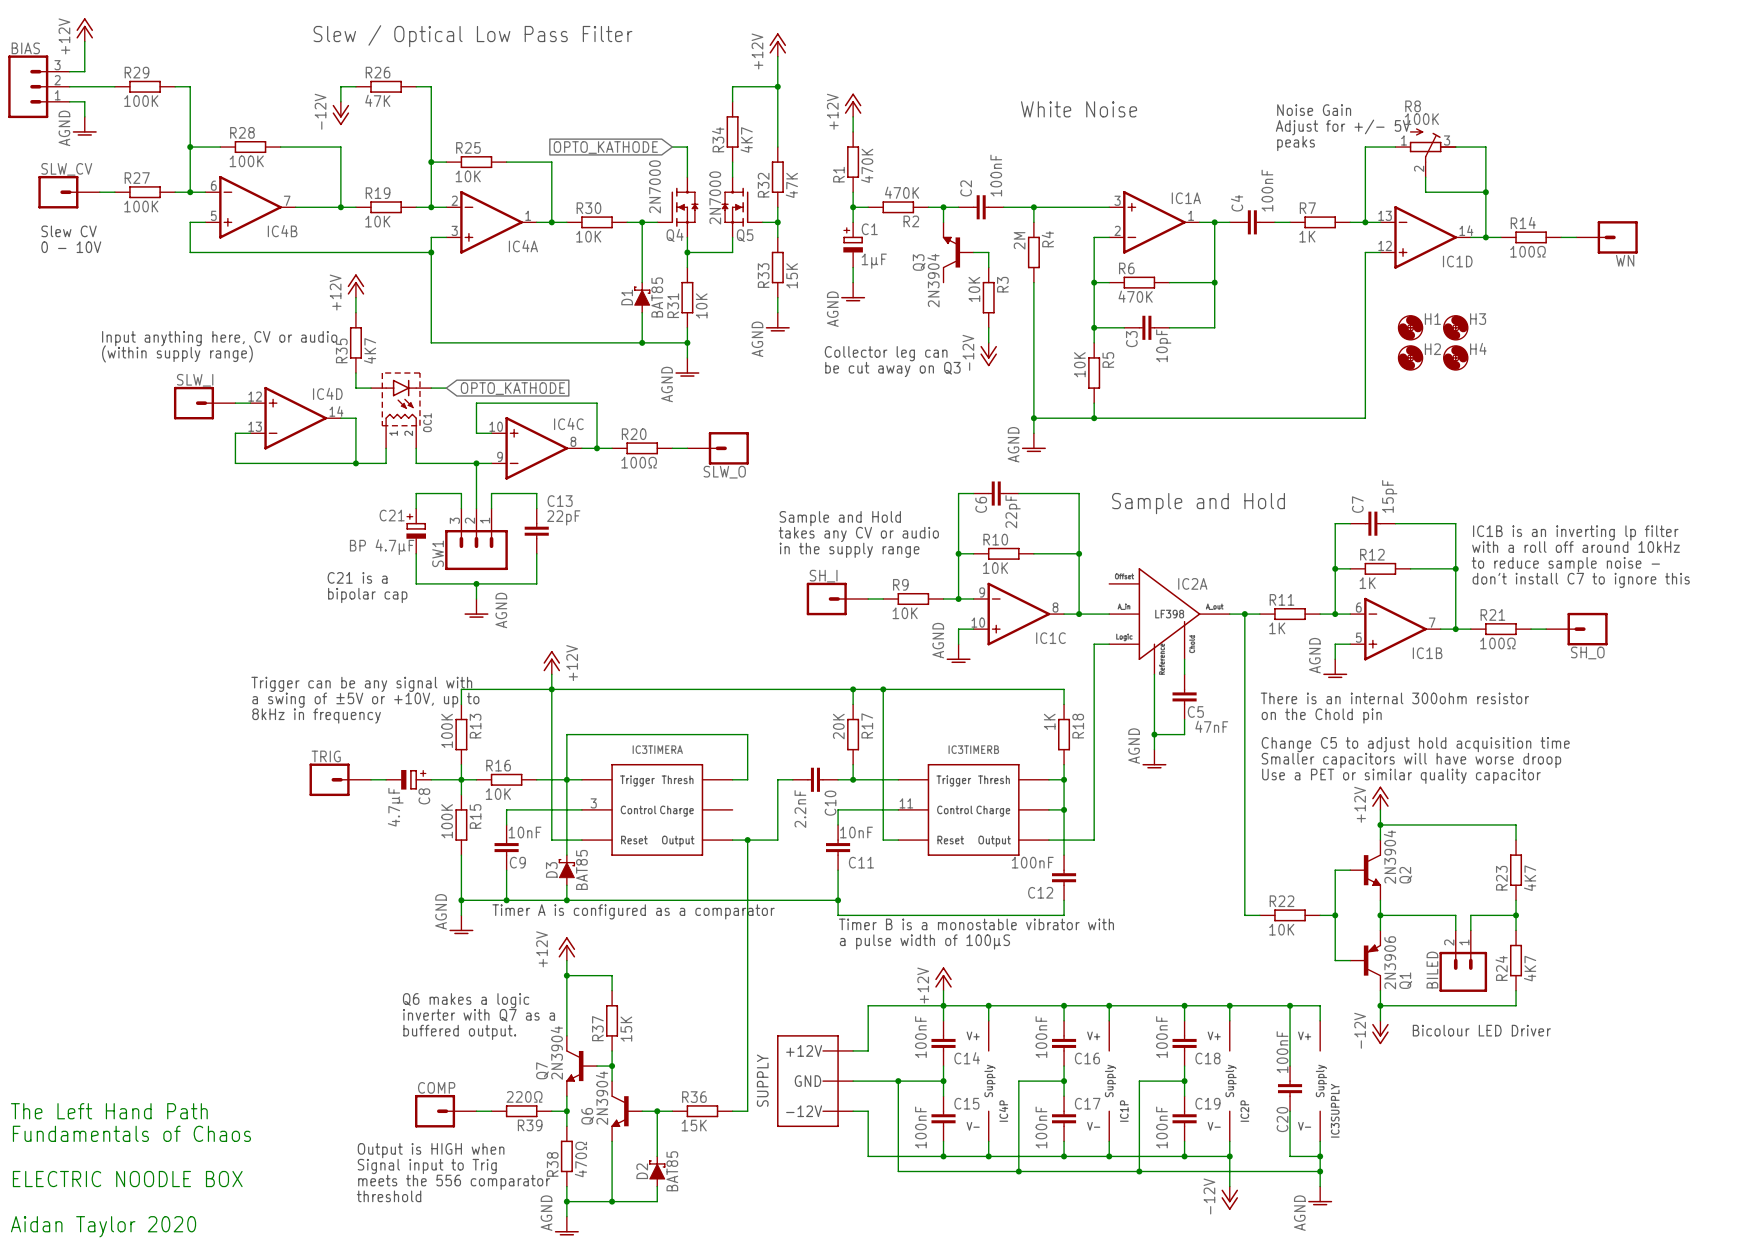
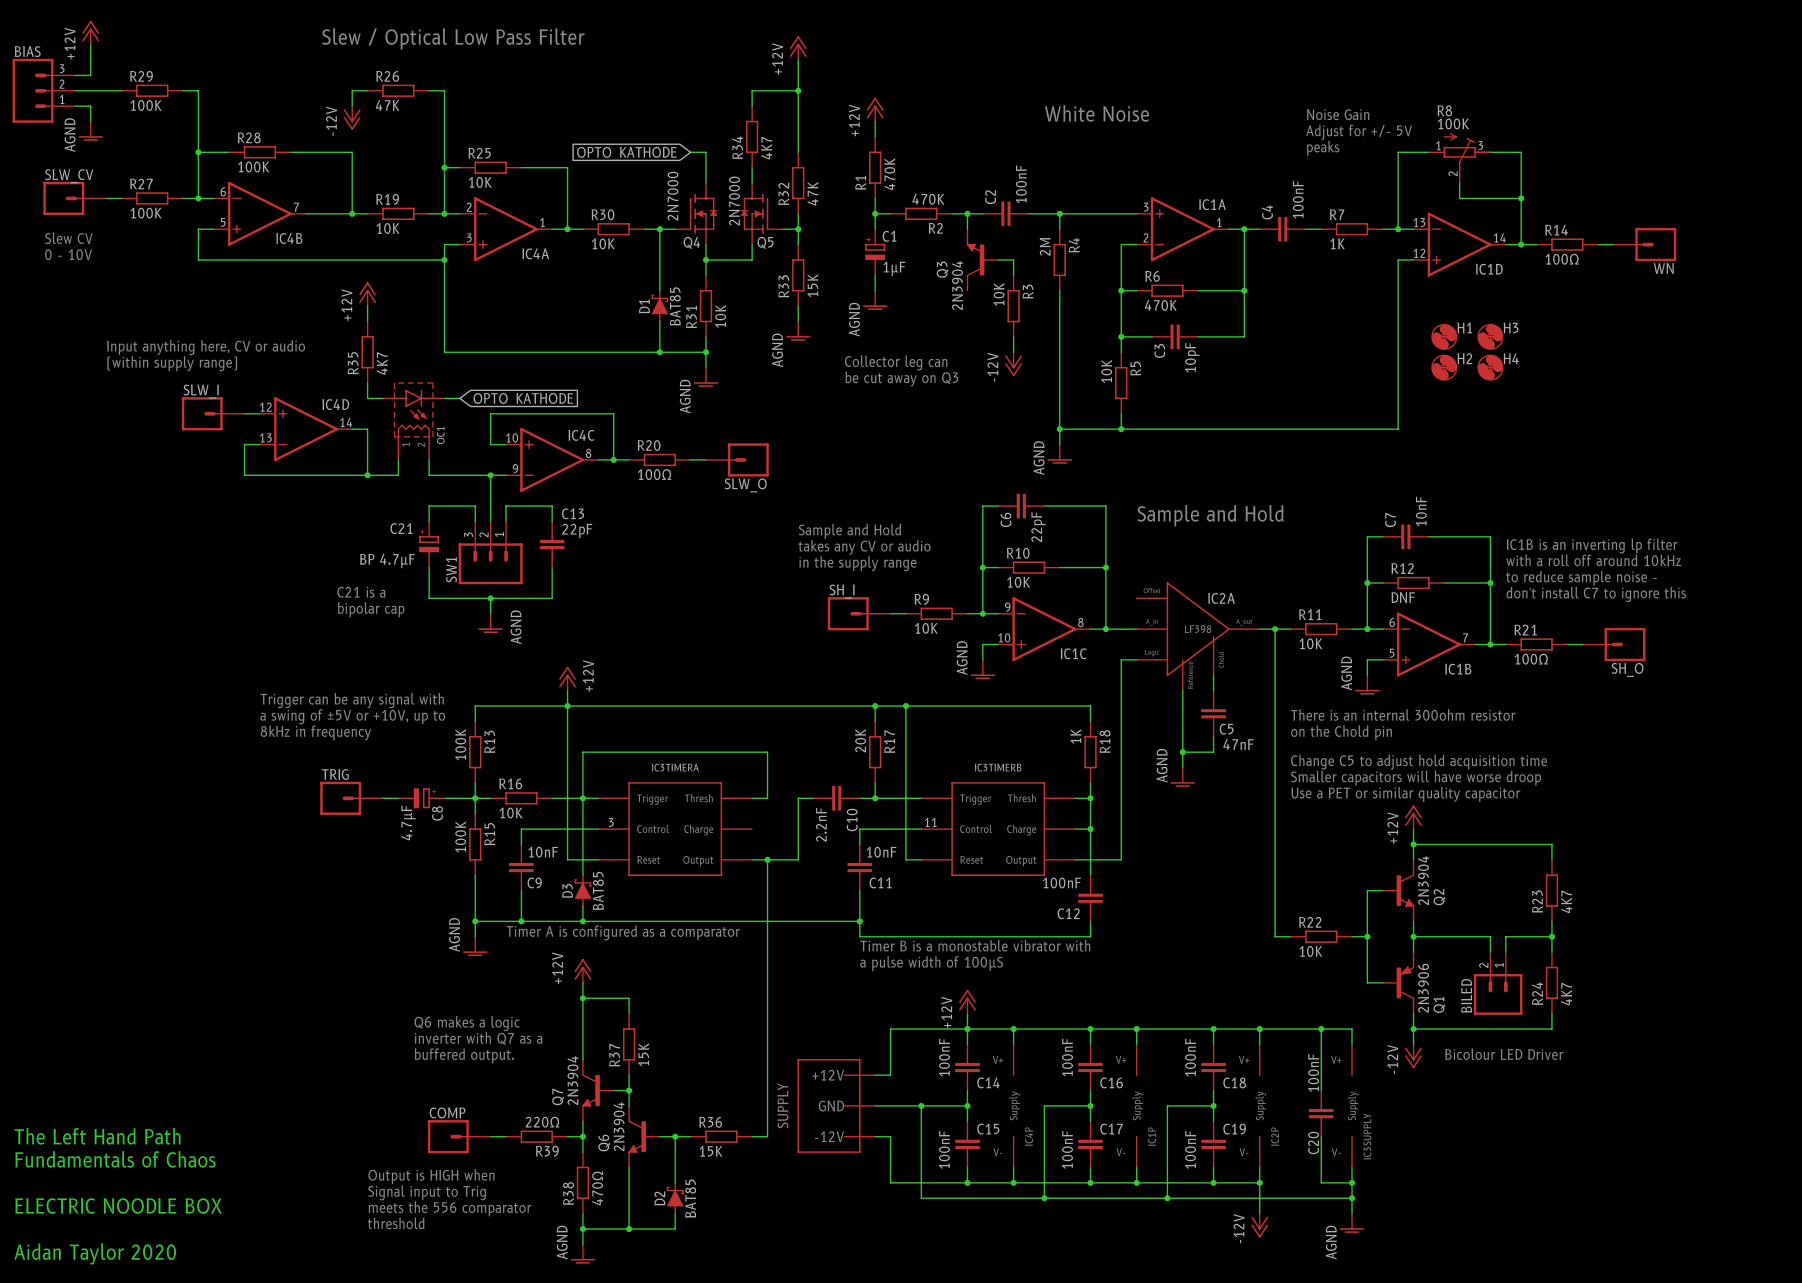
C7 value: 15pF (1389, 496) -> 10nF (1421, 511)
R12 value: 1K (1367, 583) -> DNF (1403, 597)
R11 value: 1K (1277, 628) -> 10K (1310, 643)

